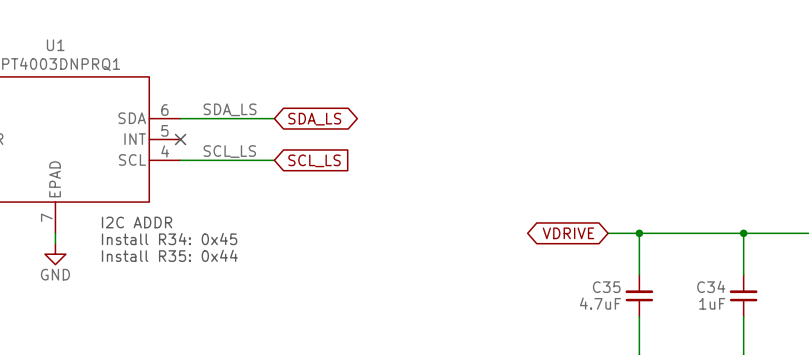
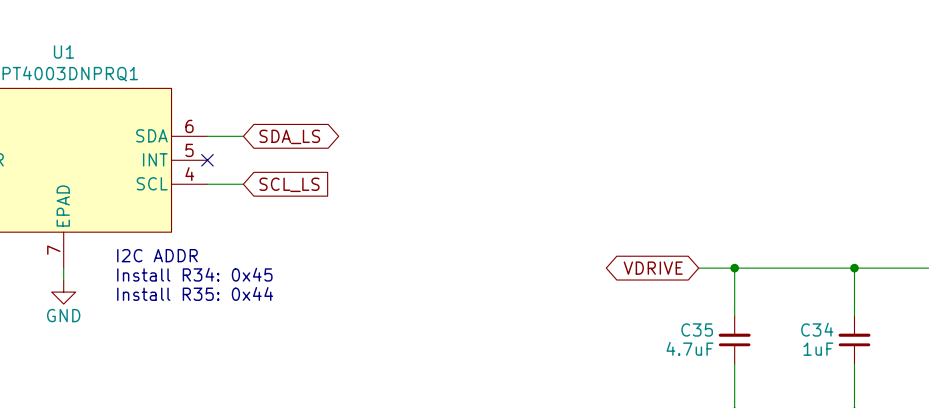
label: SDA_LS (230, 109) -> none
wire: (211, 118) (274, 118) -> none
global label position: SDA_LS (314, 119) -> SDA_LS (289, 136)
label: SCL_LS (229, 151) -> none
wire: (211, 160) (274, 160) -> none
global label position: SCL_LS (314, 160) -> SCL_LS (289, 184)

